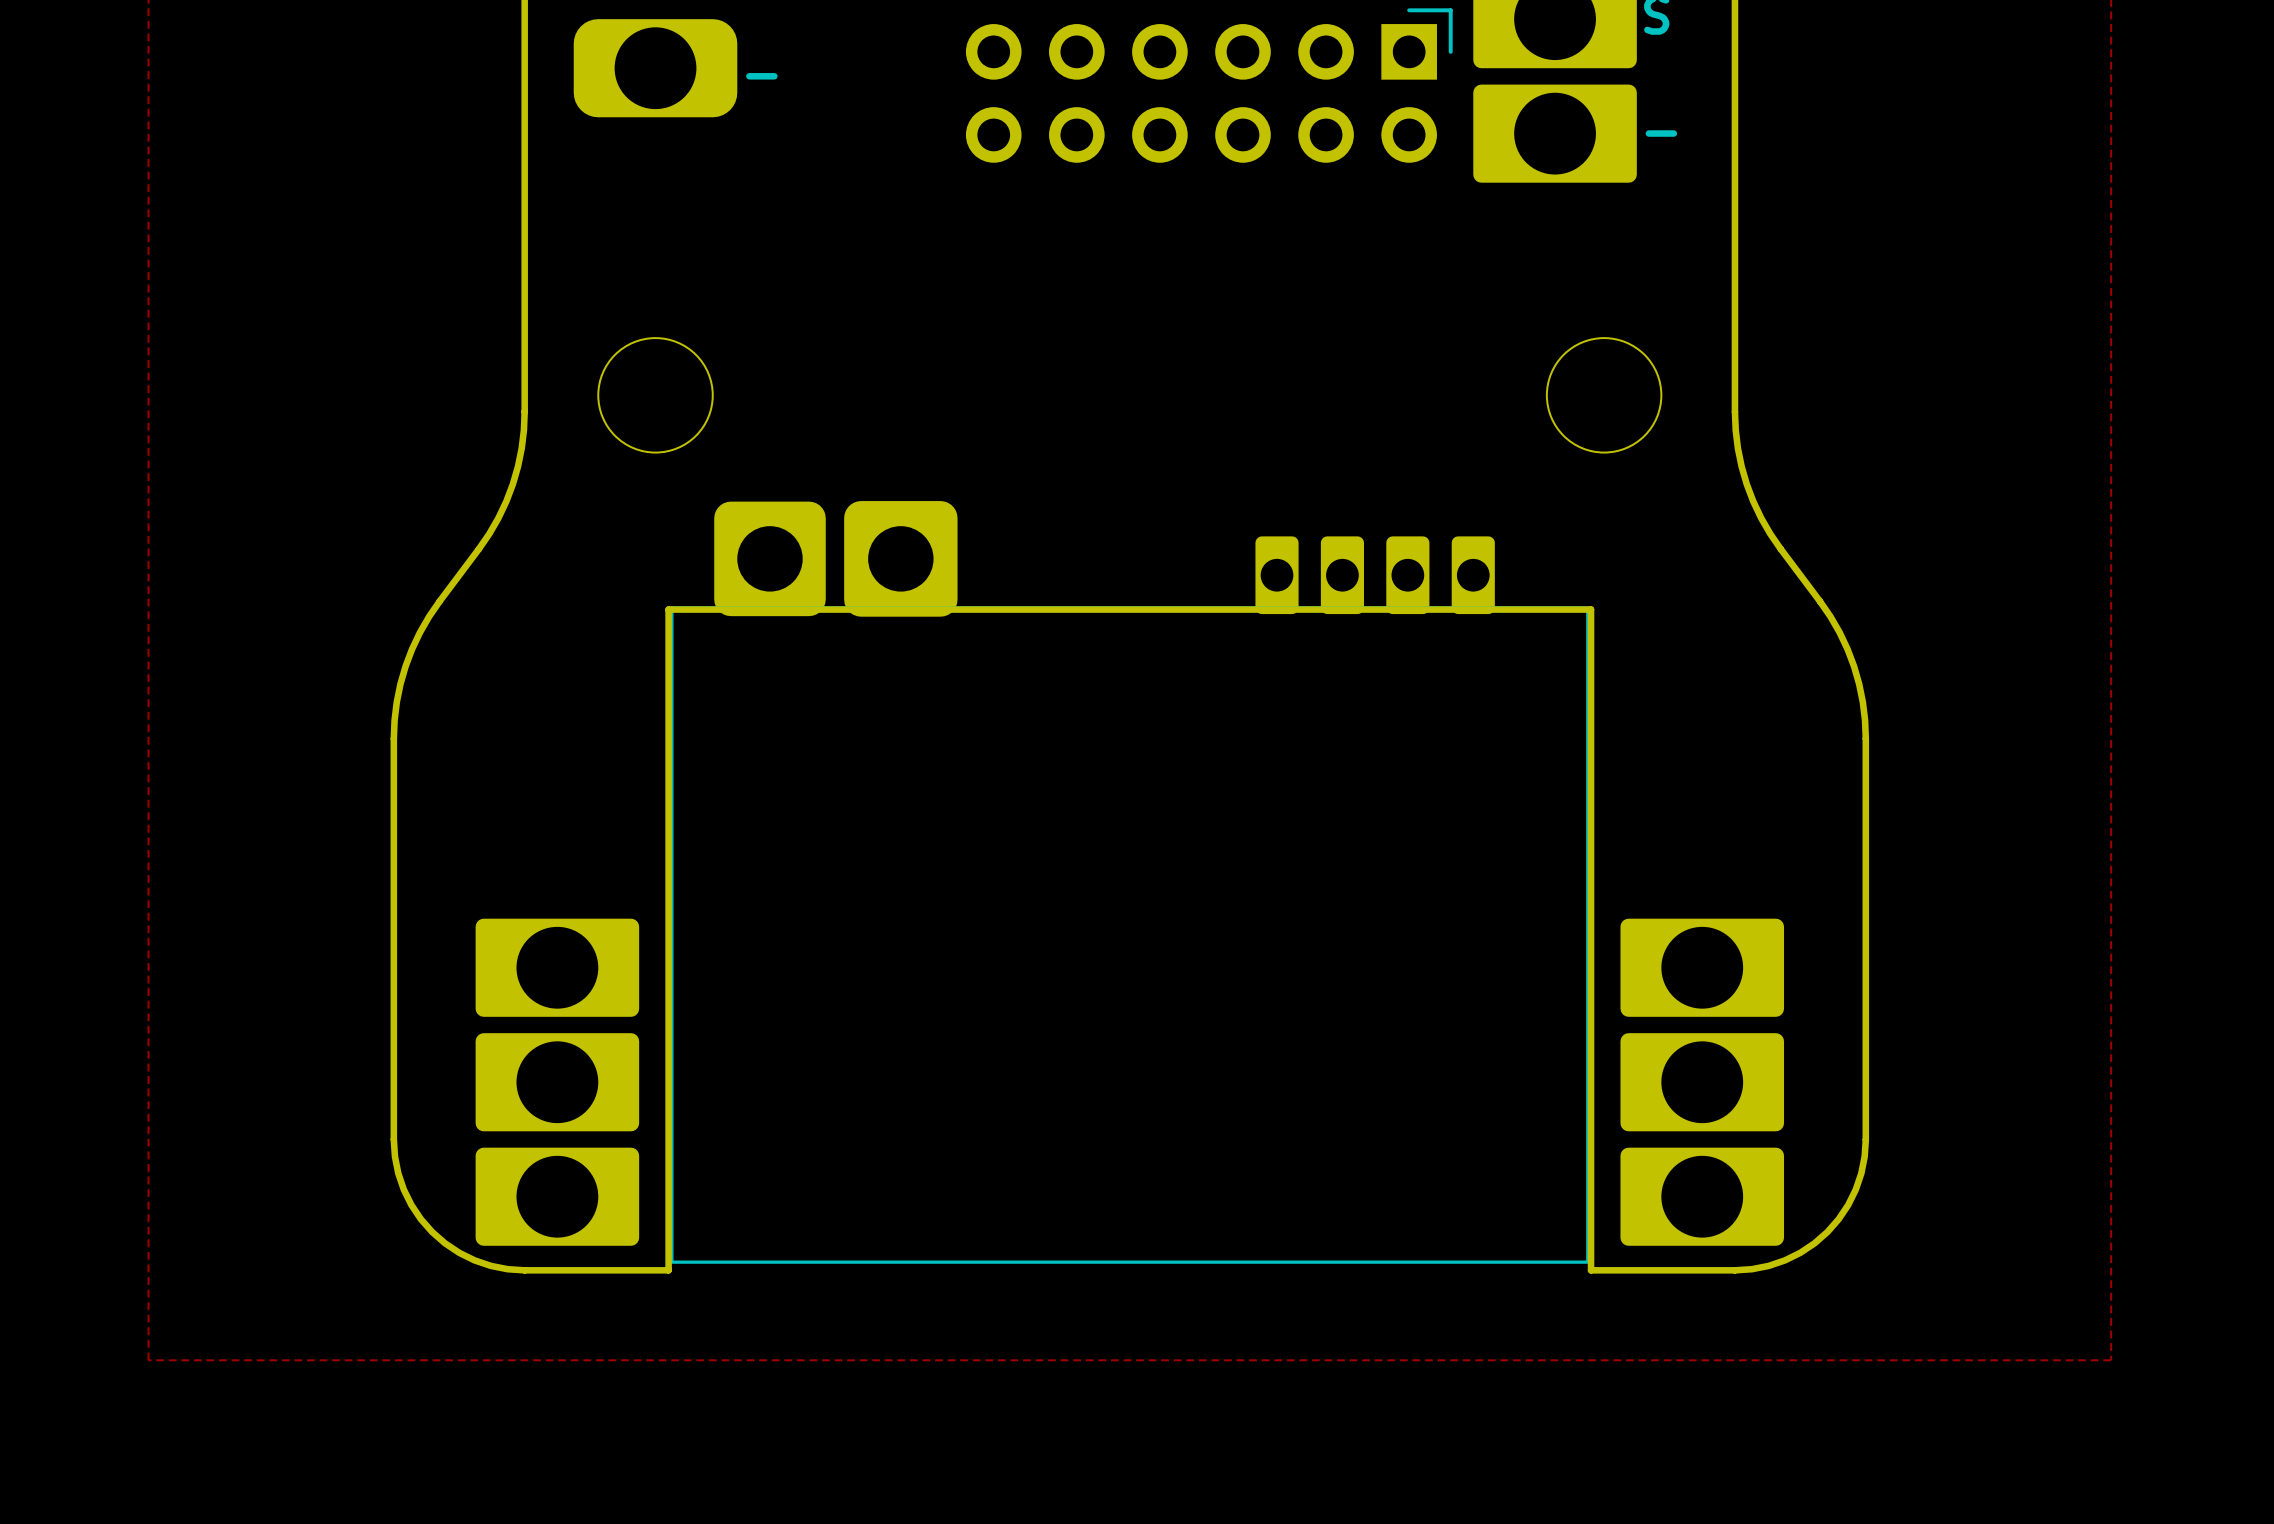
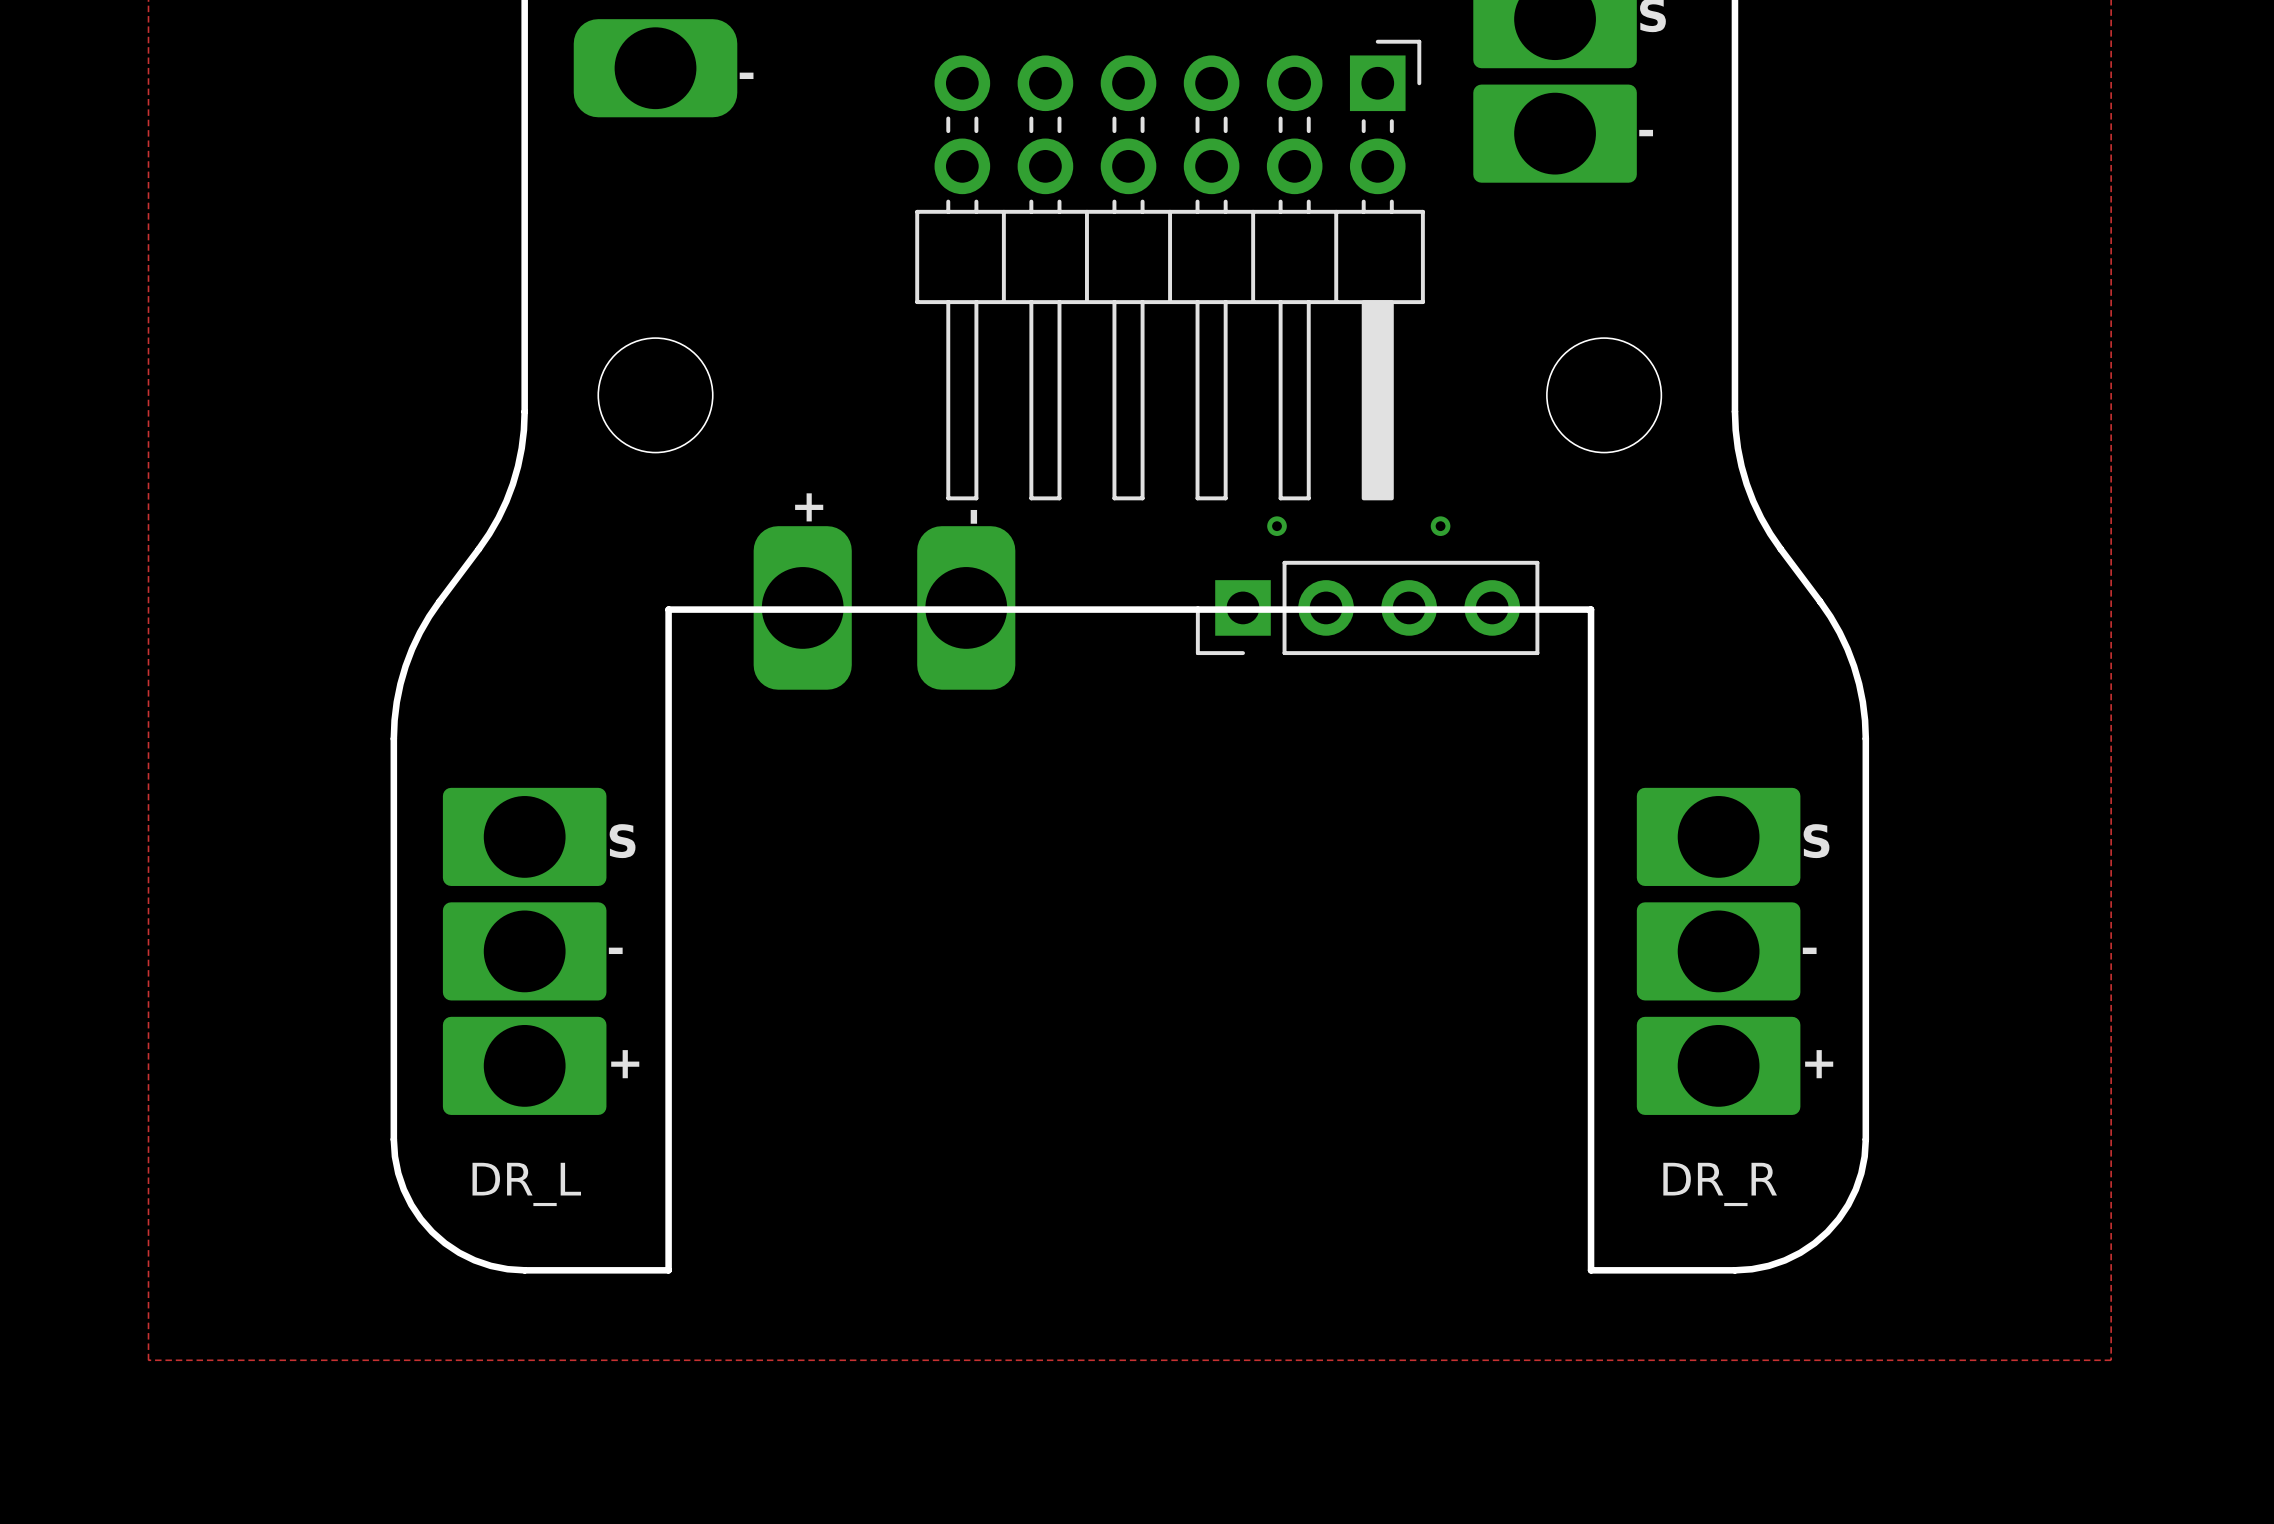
part: (1209, 85) -> none
part: none -> (1170, 270)
via: none -> (1277, 526)
via: none -> (1440, 526)
part: none -> (884, 607)
part: none -> (1367, 607)
part: (1129, 882) -> none
part: none -> DR_L (524, 951)
part: none -> DR_R (1718, 951)

